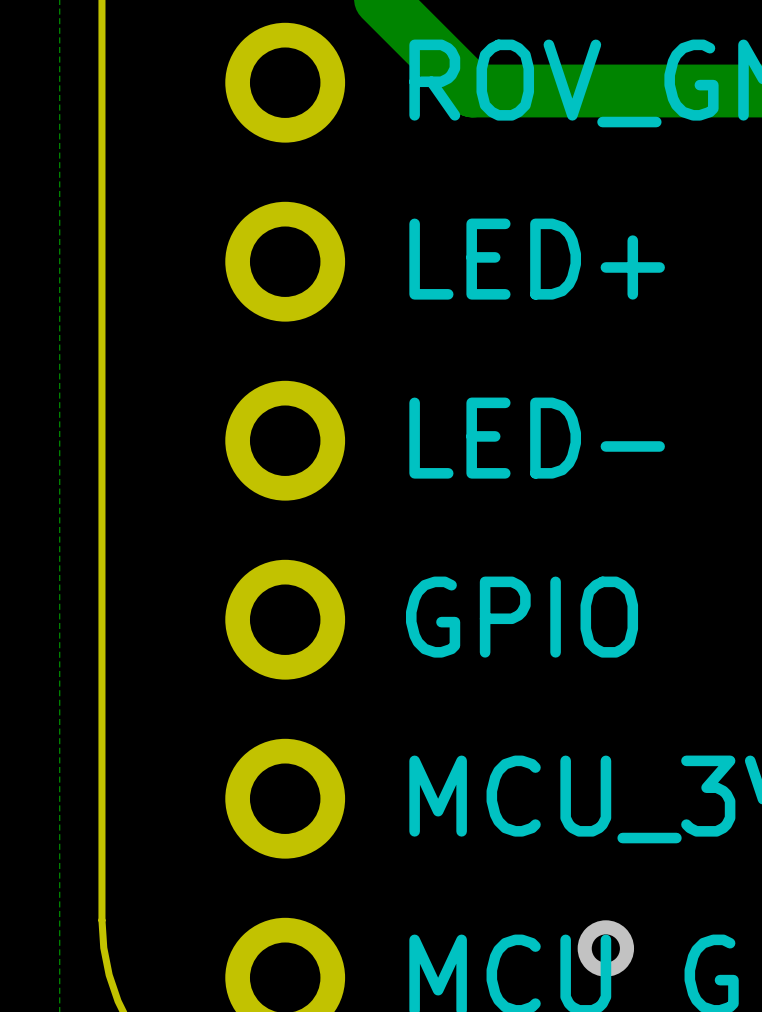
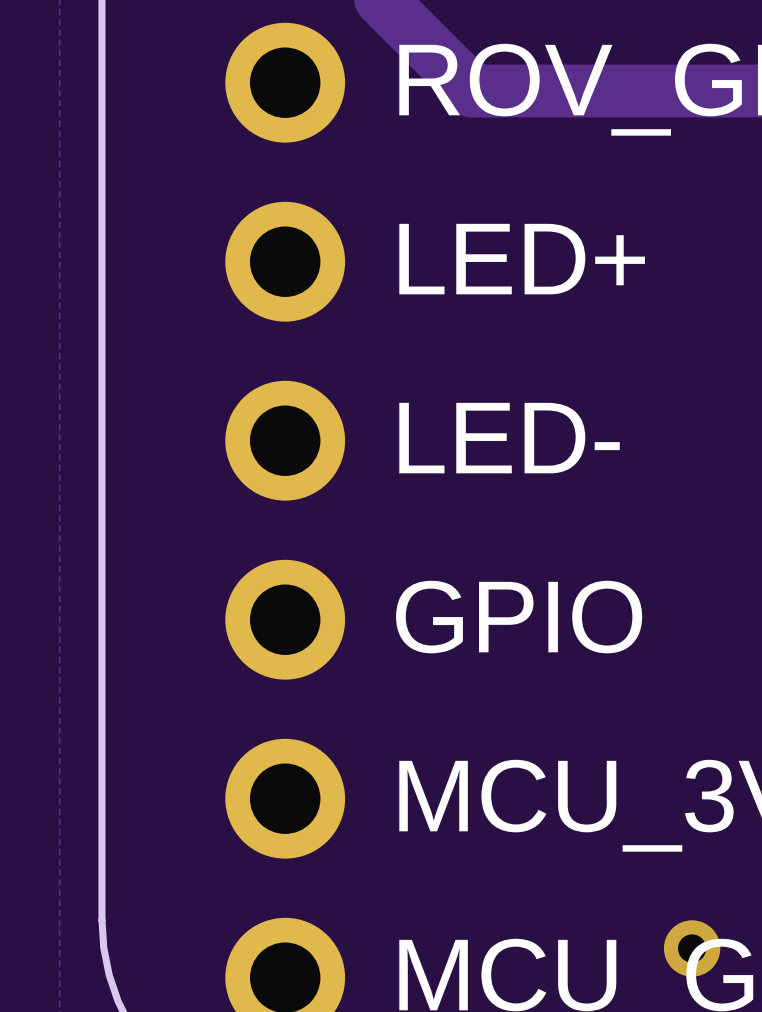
via position: (605, 948) -> (692, 948)

